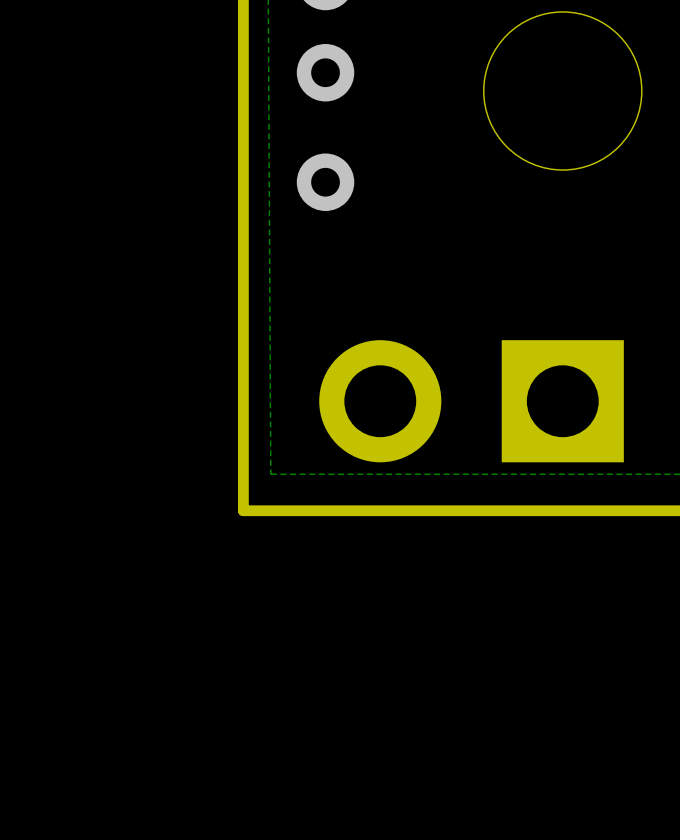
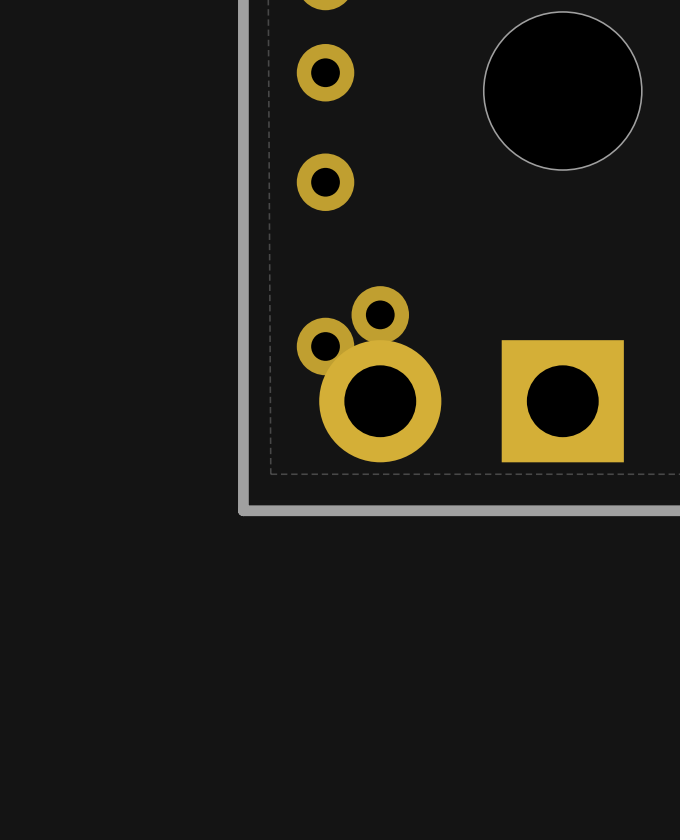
via: none -> (380, 314)
via: none -> (325, 346)

